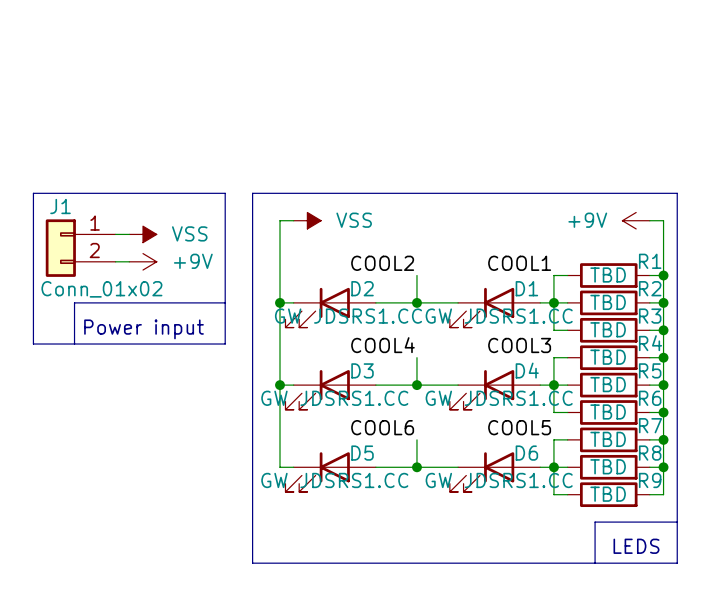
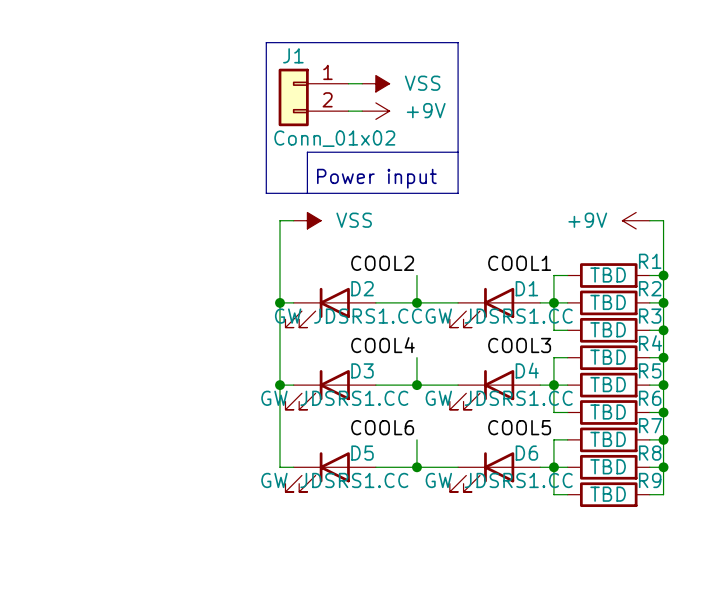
wire: none -> (348, 83) (362, 83)
power symbol: none -> VSS (375, 83)
power symbol: none -> +9V (375, 111)
line: none -> (458, 152) (307, 152) (307, 193)
text: none -> Power input (376, 178)
line: (33, 193) (225, 193) (225, 344) (33, 344) (33, 193) -> none
line: (266, 193) (252, 193) (252, 563) (677, 563) (677, 193) (458, 193) -> (266, 193) (266, 42) (458, 42) (458, 193)
wire: (115, 234) (129, 234) -> (348, 111) (362, 111)
power symbol: VSS (143, 234) -> none
J1 position: (80, 248) -> (313, 97)
wire: (115, 261) (129, 261) -> none
power symbol: +9V (143, 261) -> none
line: (225, 302) (74, 302) (74, 344) -> none
text: Power input (143, 329) -> none
line: (677, 522) (595, 522) (595, 563) -> none
text: LEDS (636, 546) -> none

